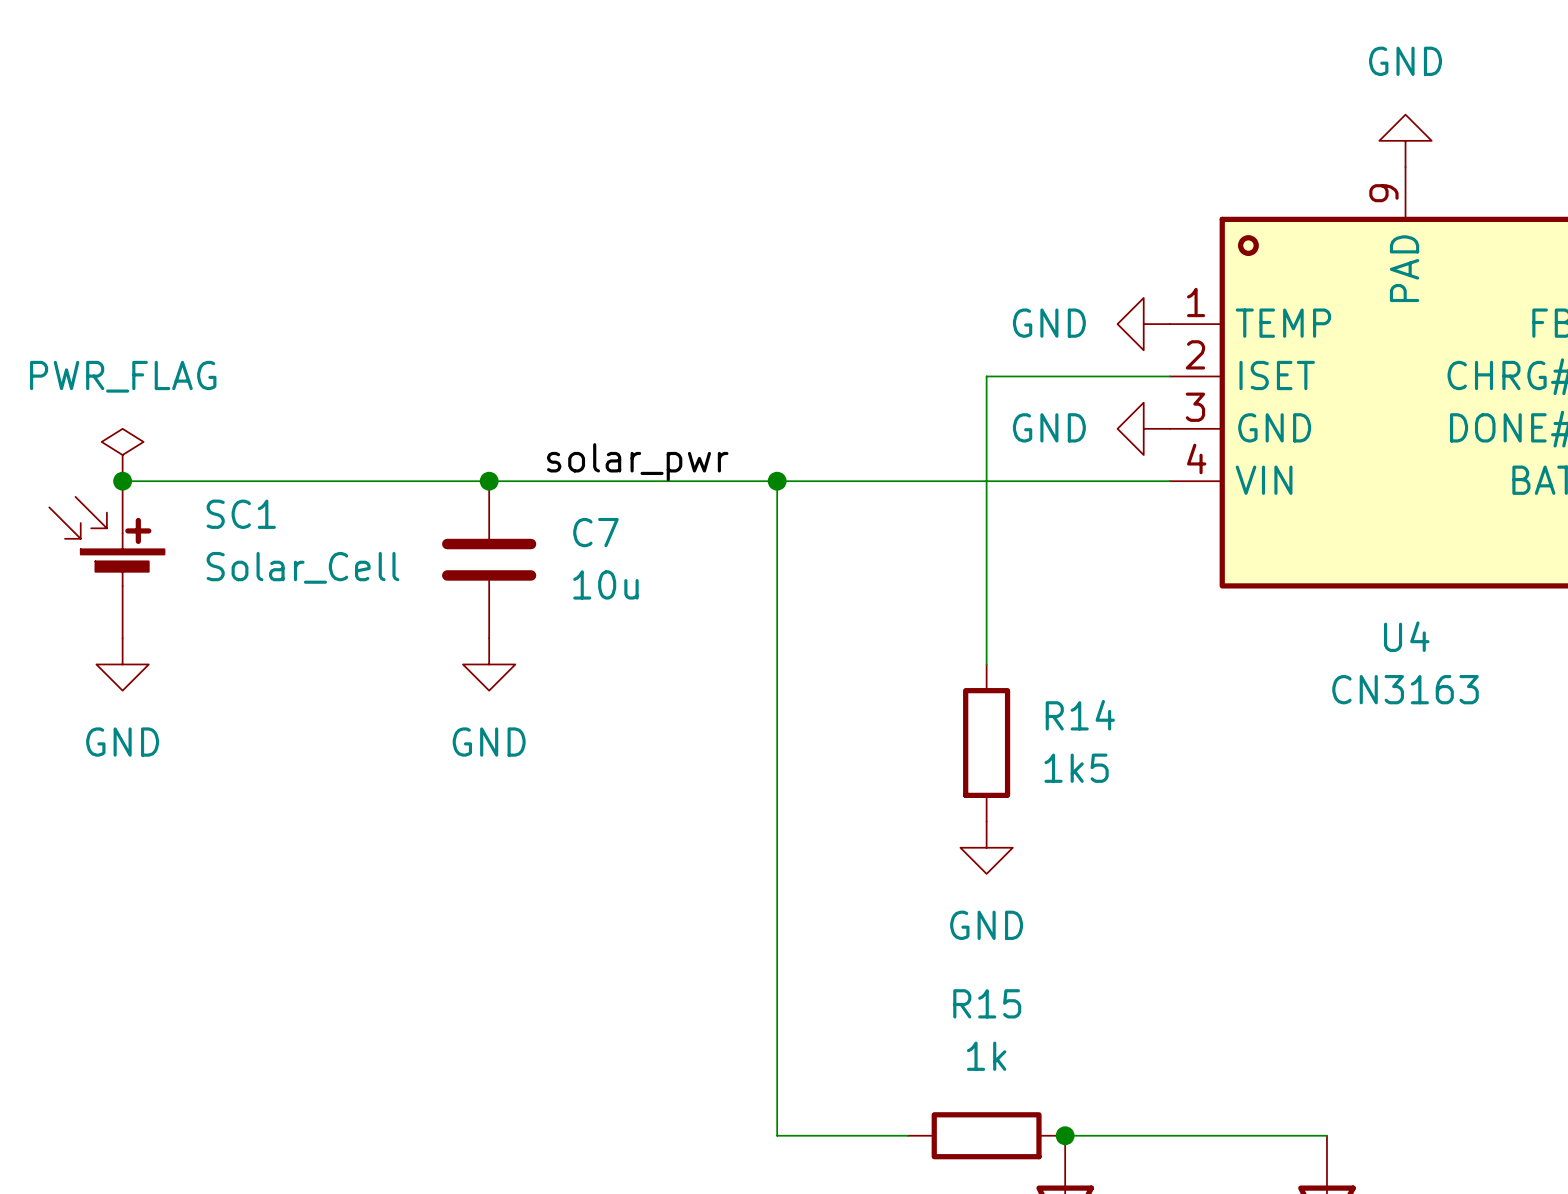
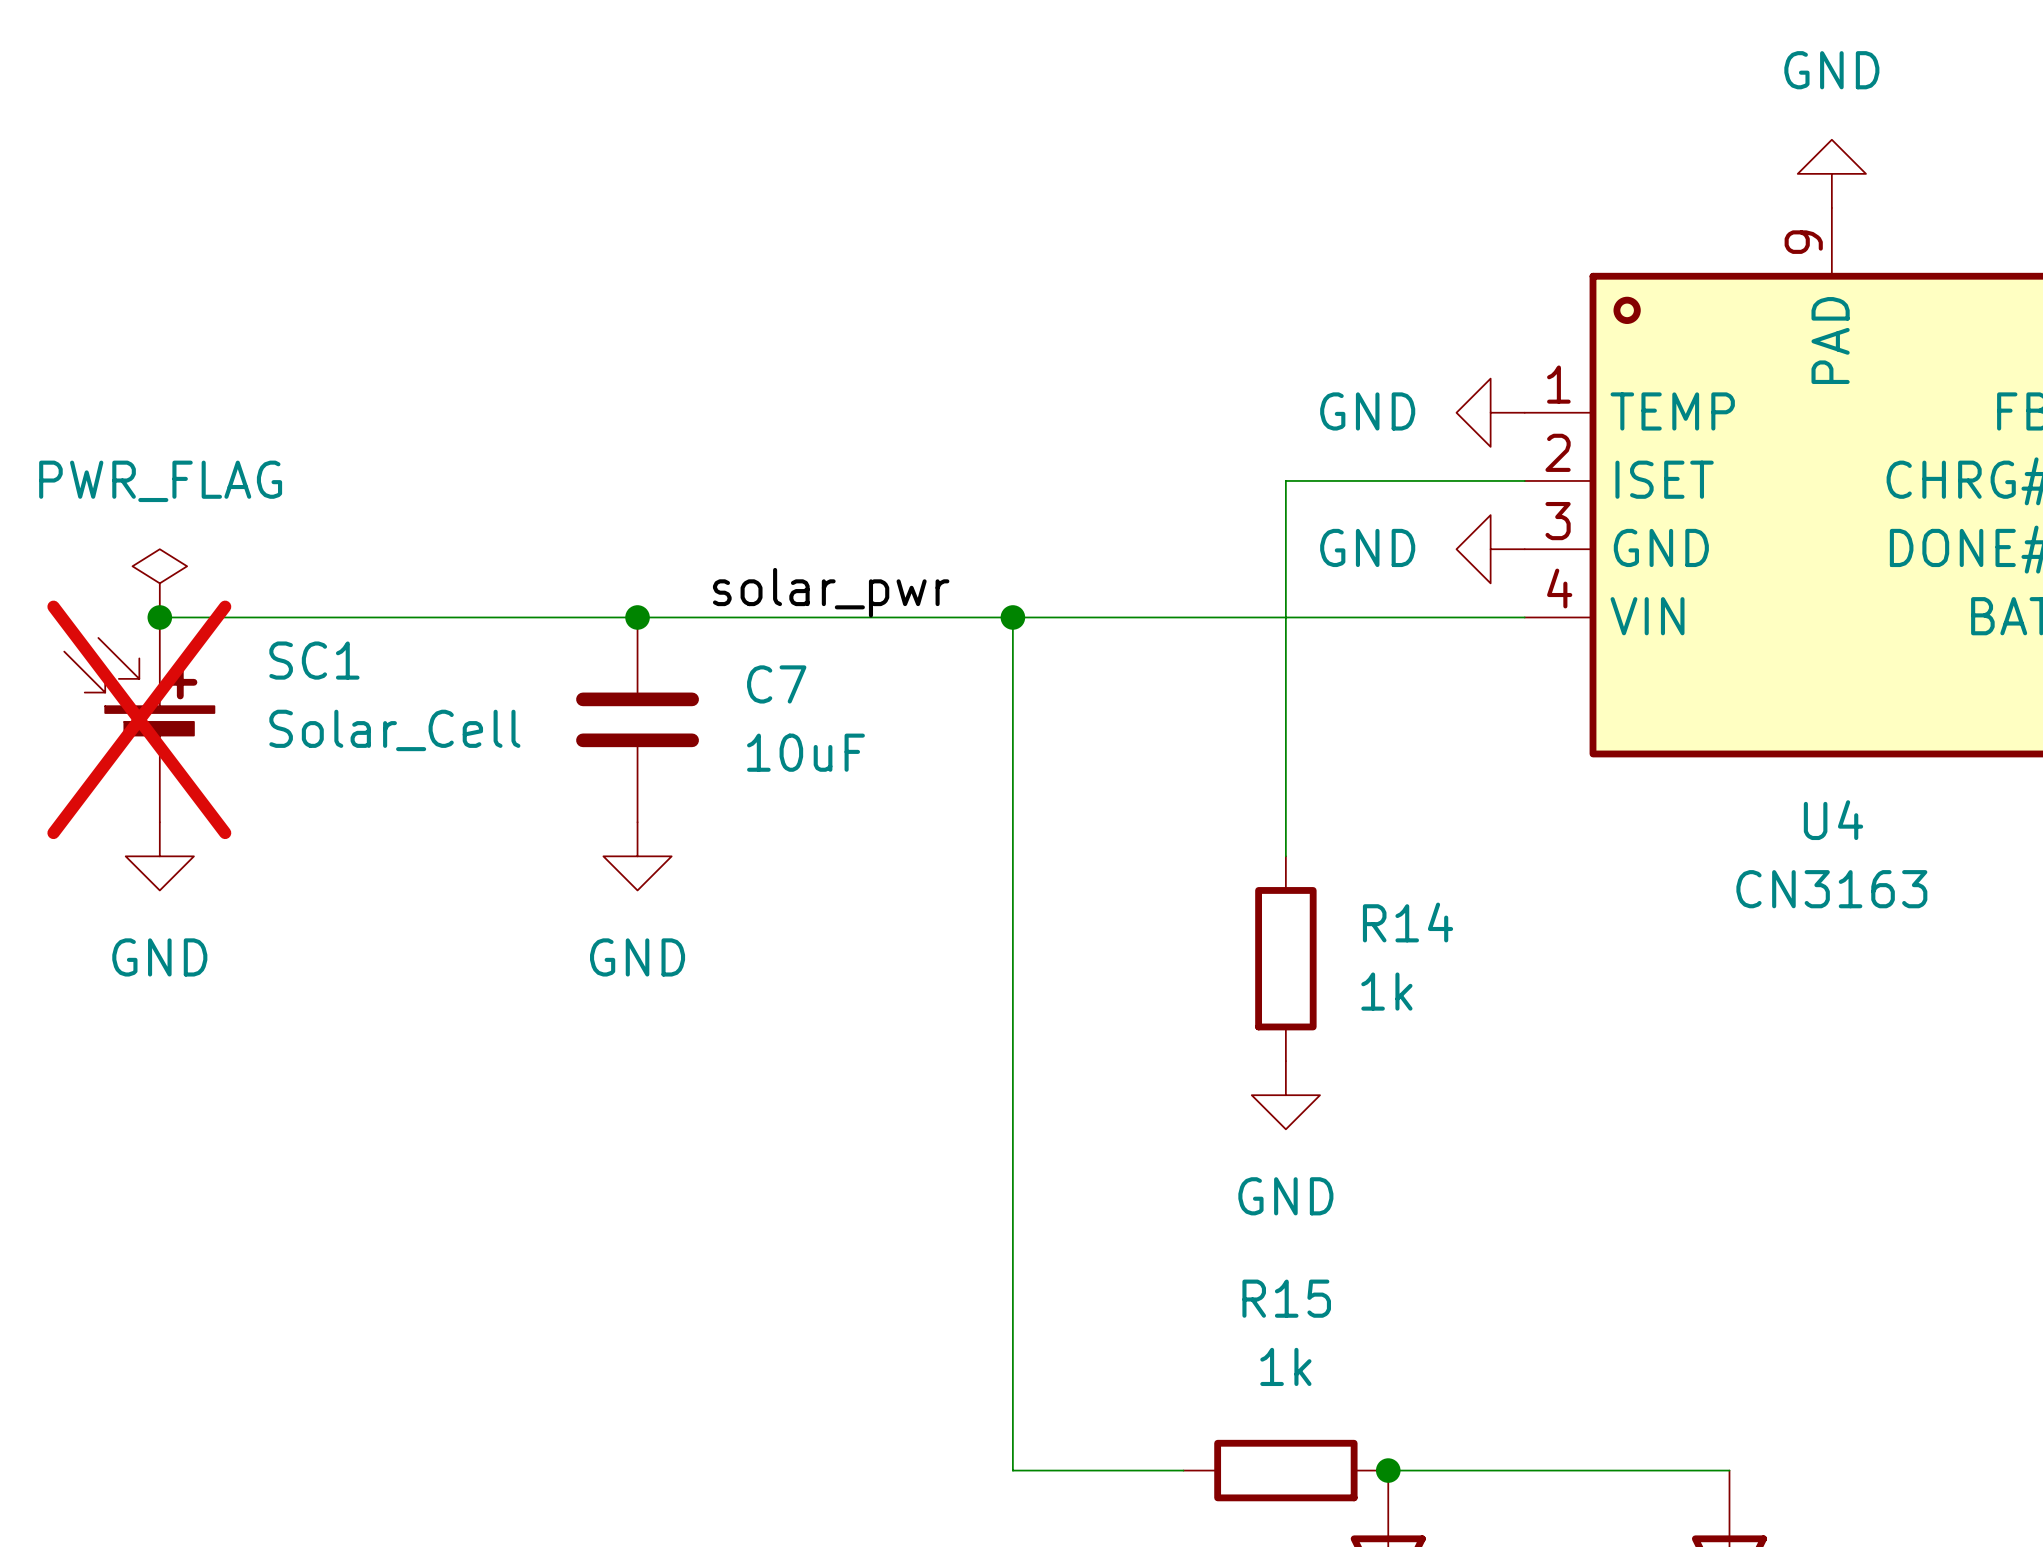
SC1 do-not-place cross: none -> (139, 719)
C7 value: 10u (605, 584) -> 10uF (805, 752)
R14 value: 1k5 (1076, 768) -> 1k (1386, 991)

